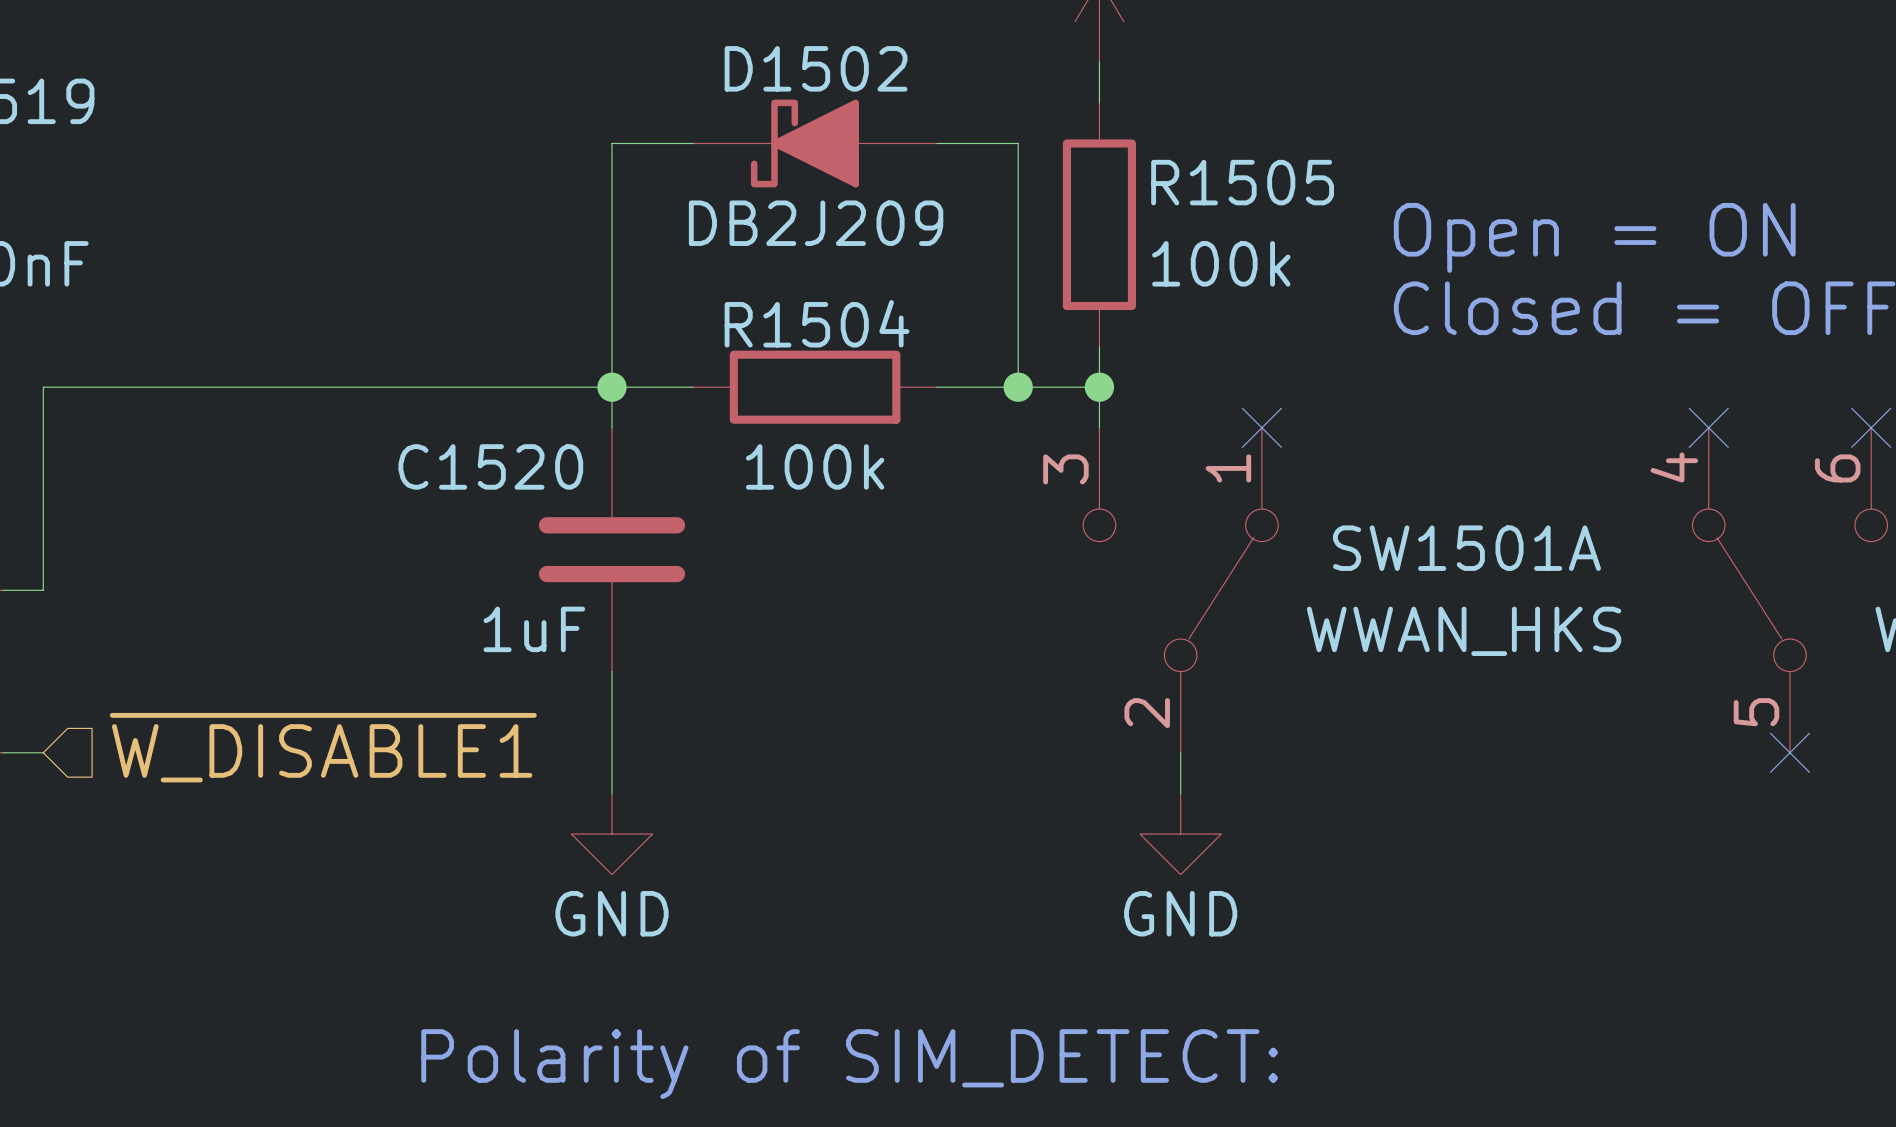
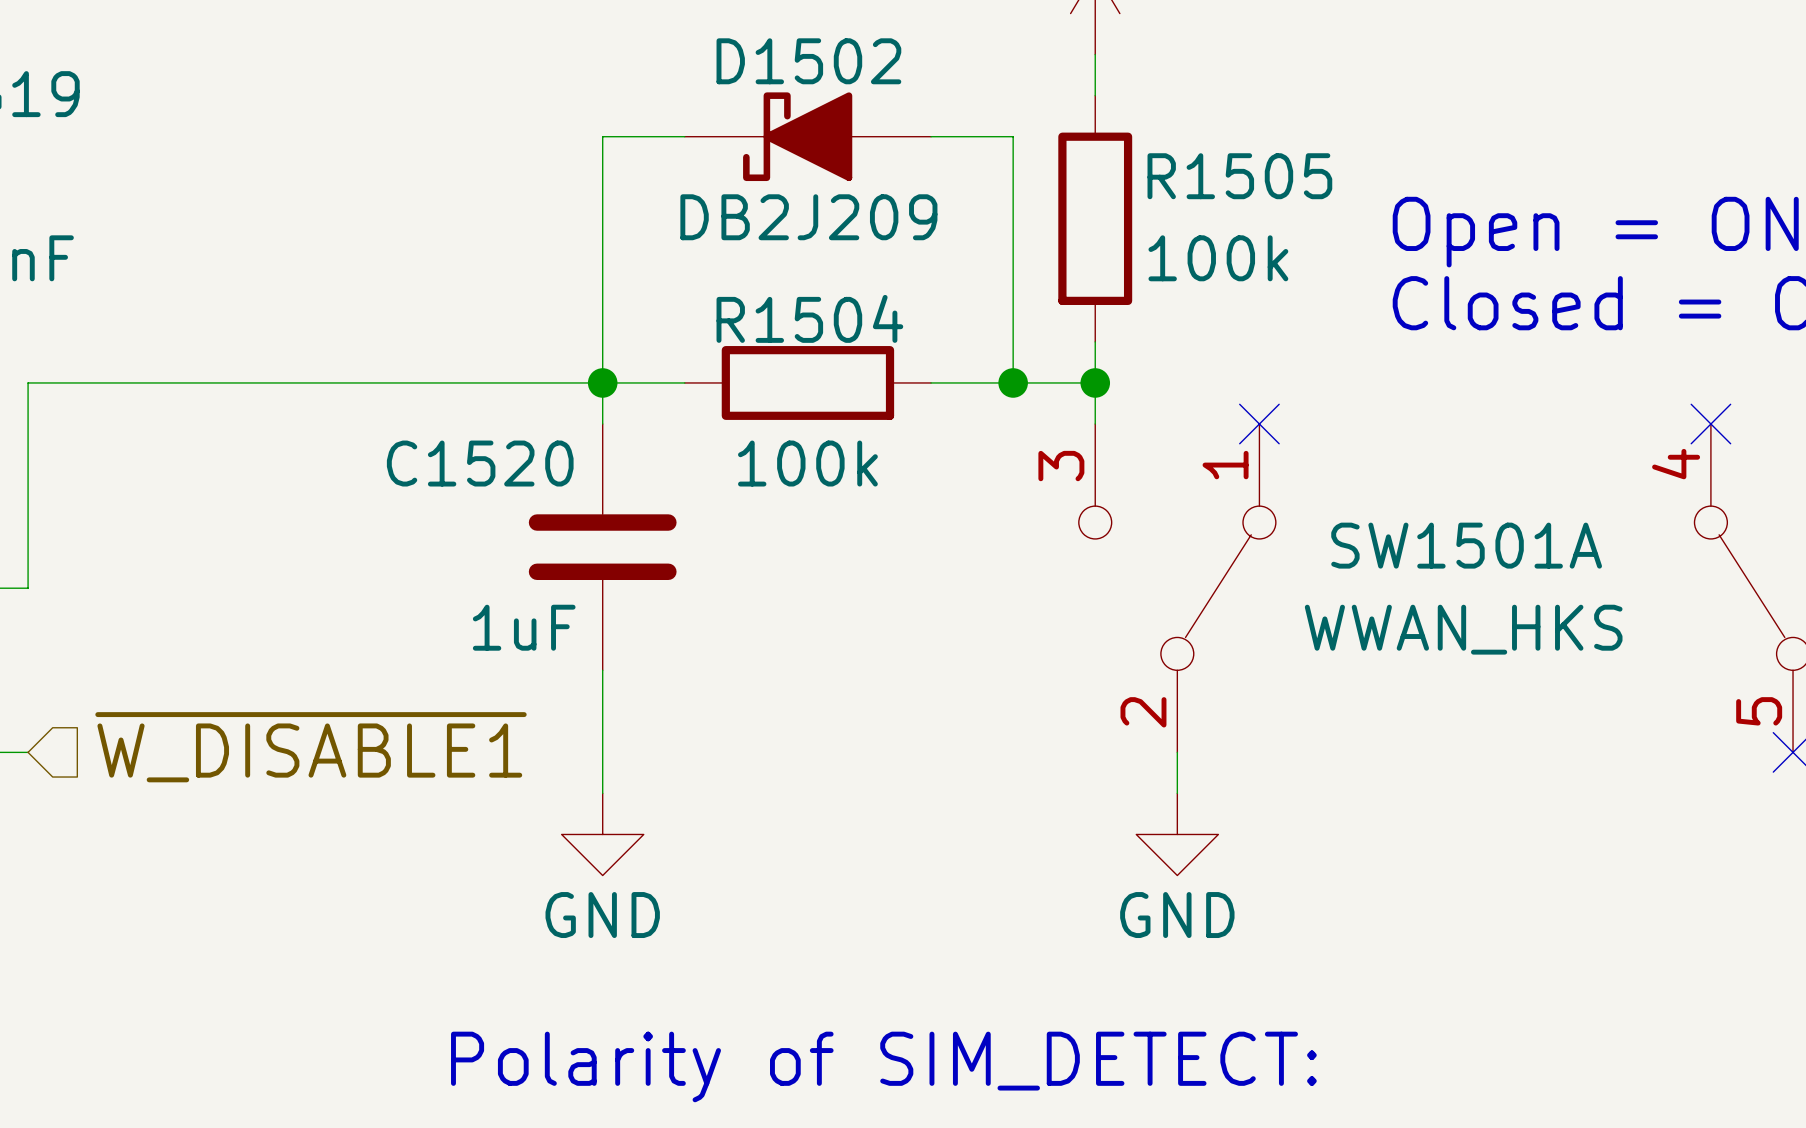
text position: Polarity of SIM_DETECT: (849, 1064) -> Polarity of SIM_DETECT: (883, 1066)

